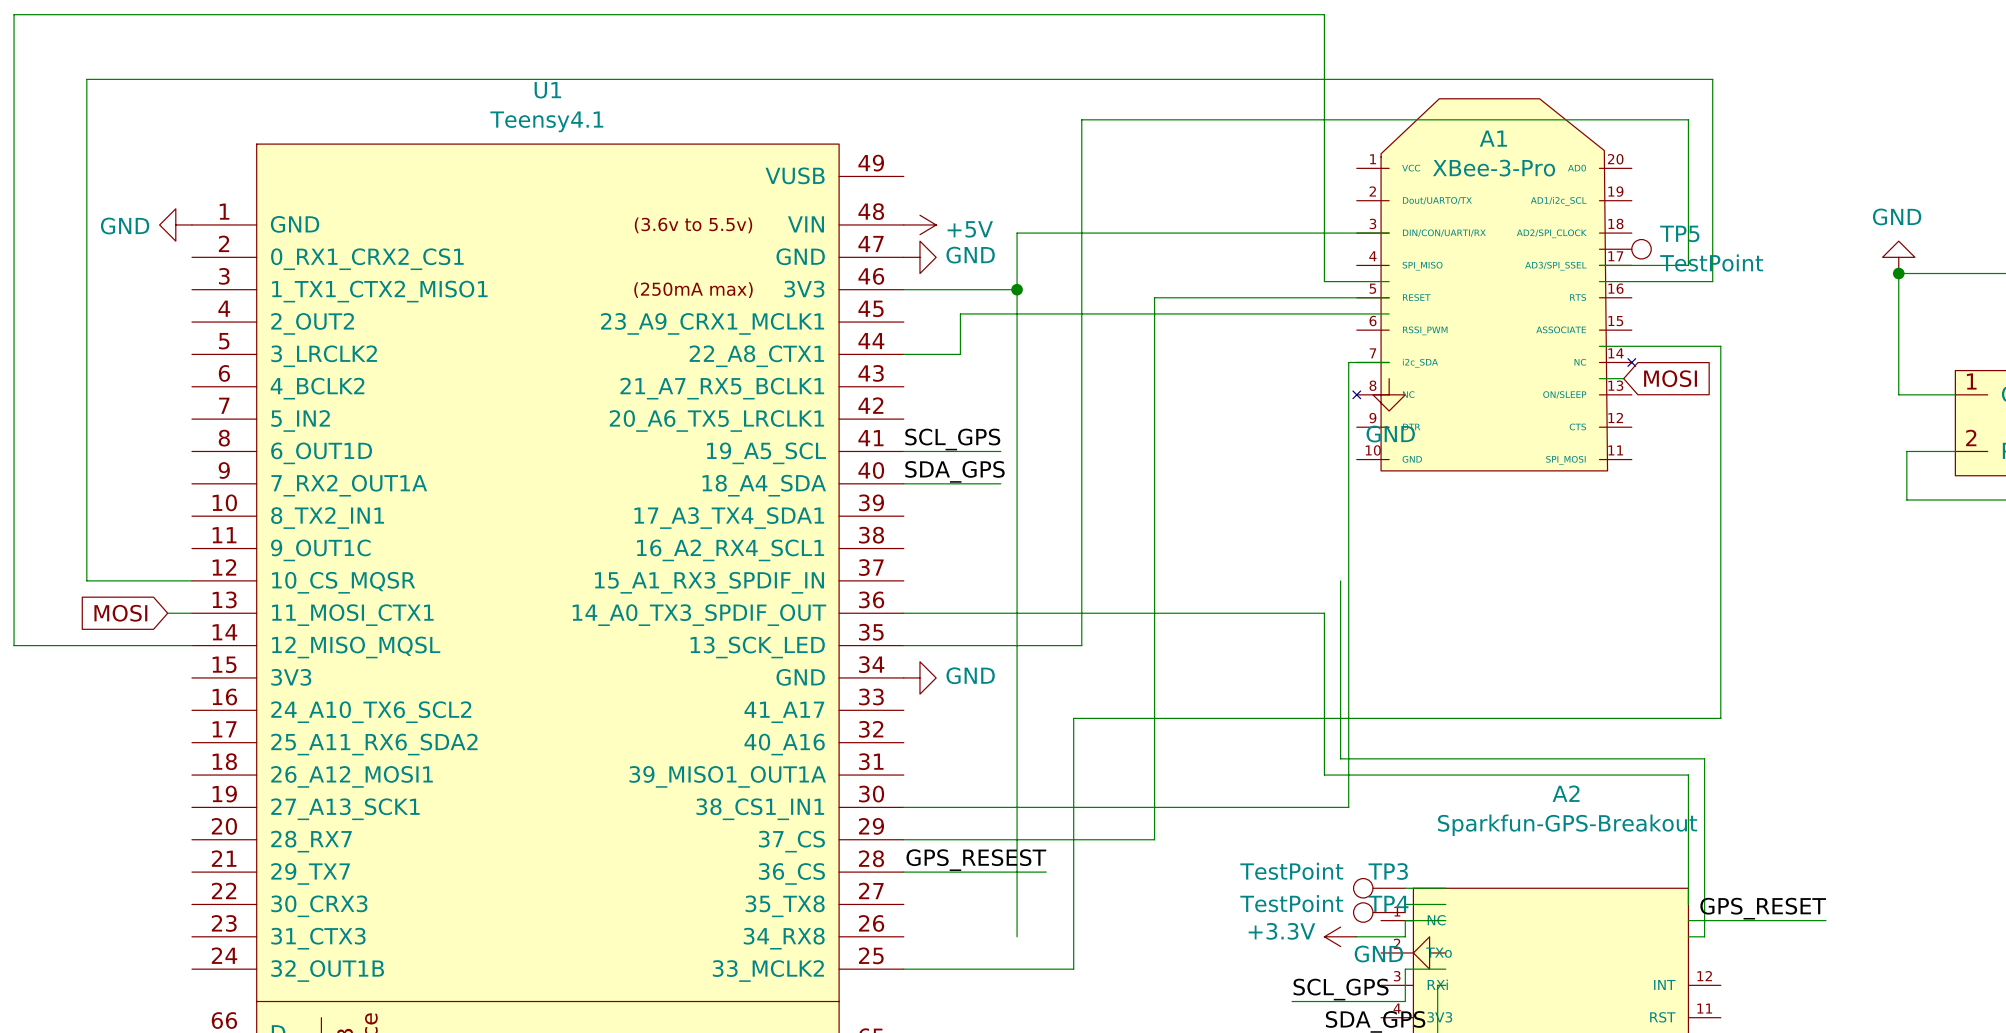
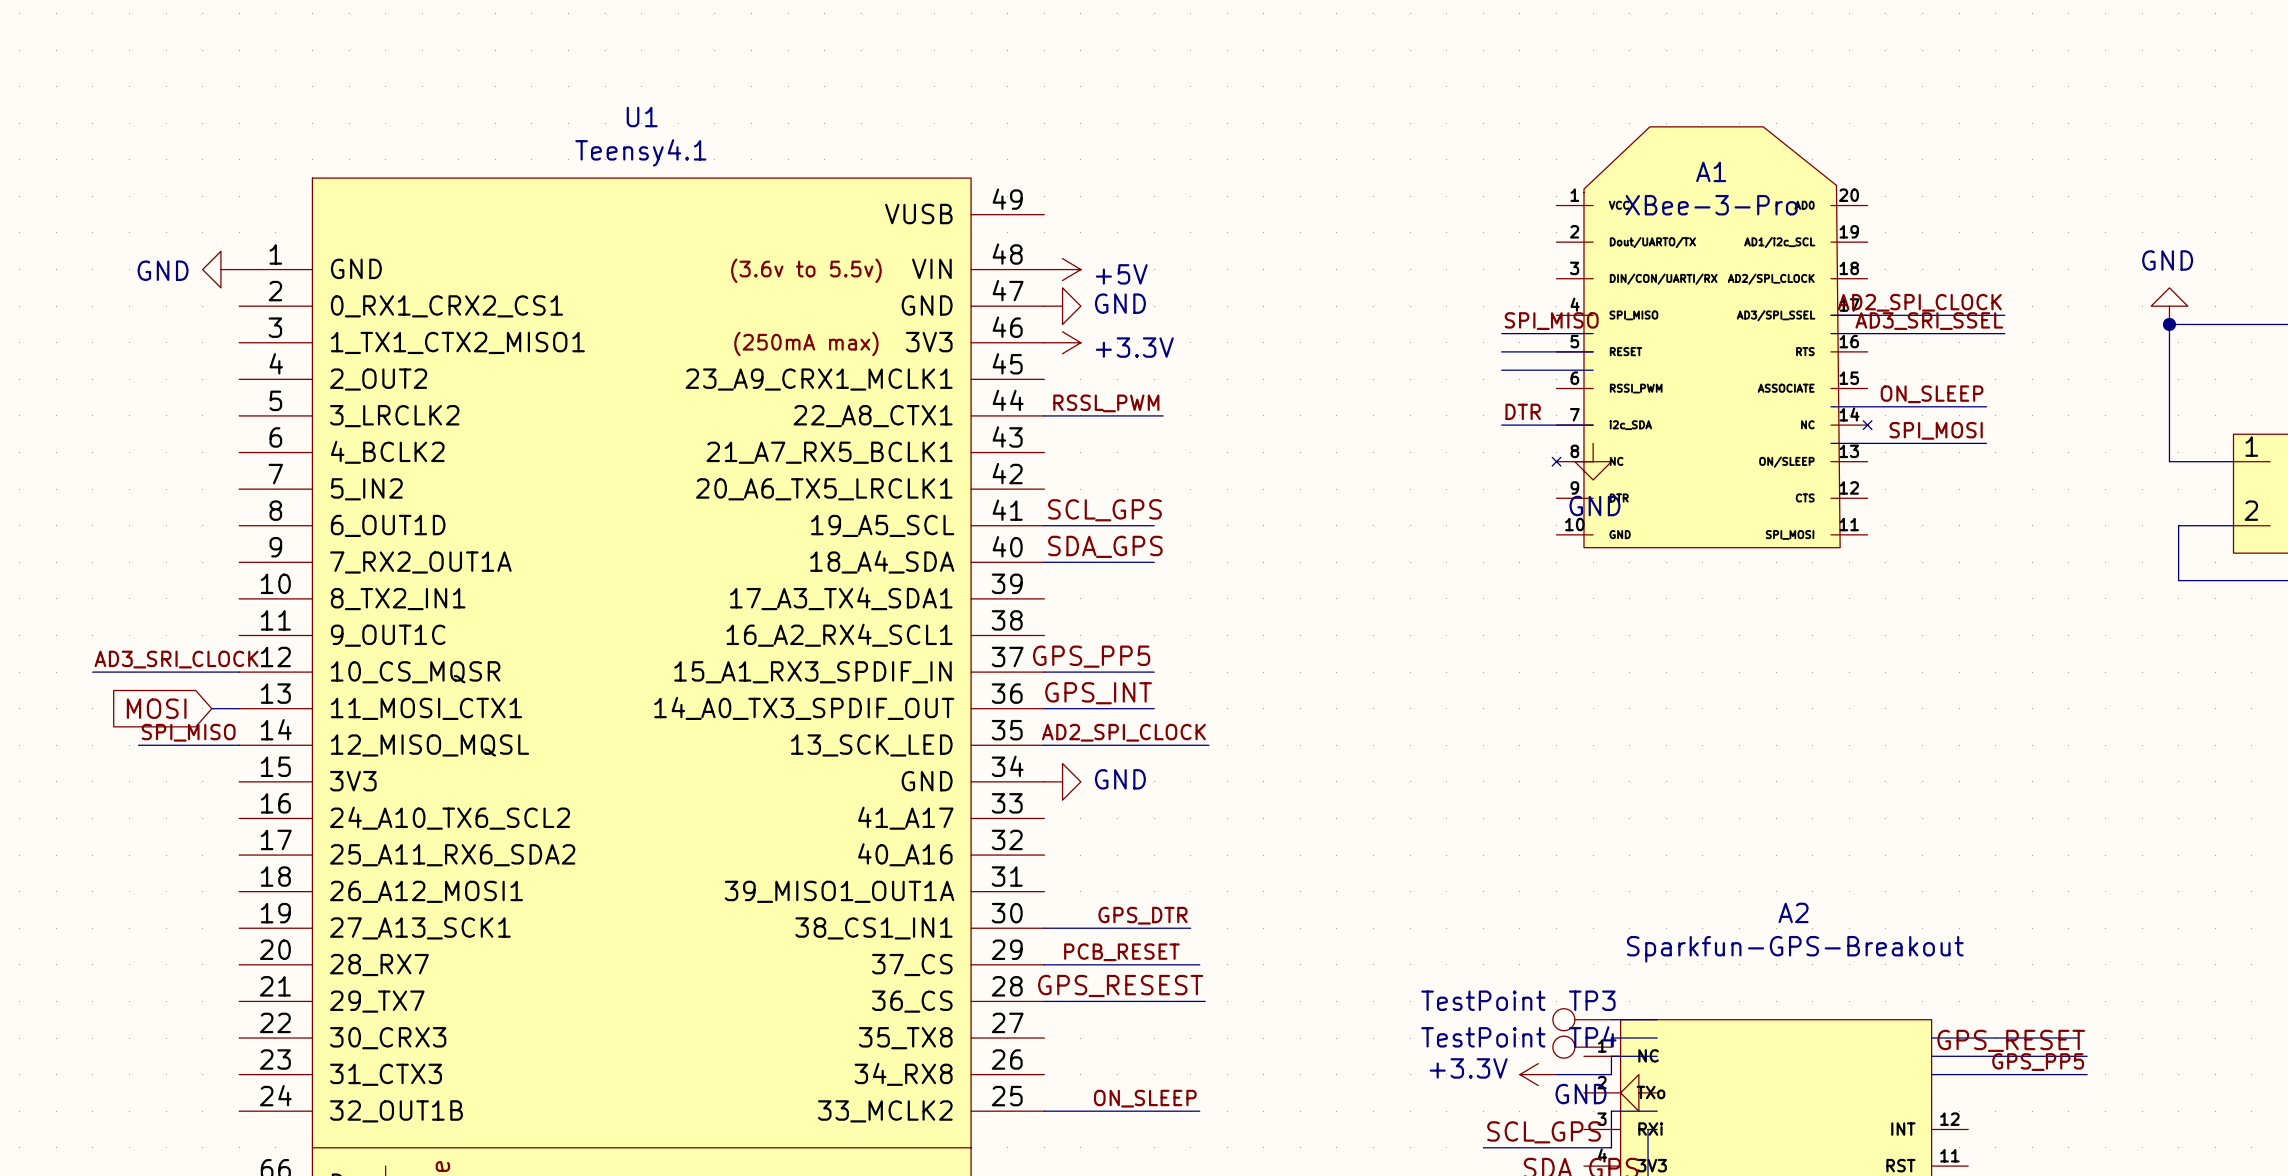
wire: (1389, 233) (1017, 233) (1017, 936) -> none
TP5: TestPoint (1625, 249) -> none
label: none -> AD2_SPI_CLOCK (1919, 302)
wire: (1688, 265) (1688, 119) (1081, 119) (1081, 645) (1049, 645) -> (1931, 315) (2004, 315)
label: none -> SPI_MISO (1551, 321)
label: none -> AD3_SRI_SSEL (1929, 321)
wire: (1324, 281) (1324, 14) (14, 14) (14, 645) (103, 645) -> (1519, 333) (1501, 333)
wire: (1712, 281) (1712, 79) (86, 79) (86, 580) -> (92, 672) (120, 672)
wire: none -> (1959, 333) (2004, 333)
wire: (903, 289) (1017, 289) -> none
power symbol: none -> +3.3V (1062, 342)
junction: (1017, 289) -> none
wire: (1308, 297) (1154, 297) (1154, 839) (1041, 839) -> none
wire: (1308, 313) (960, 313) (960, 354) -> (1163, 415) (1108, 415)
label: none -> ON_SLEEP (1932, 394)
label: none -> RSSL_PWM (1106, 403)
wire: (1720, 346) (1720, 718) (1073, 718) (1073, 969) (1041, 969) -> (1968, 406) (1986, 406)
label: none -> DTR (1523, 411)
wire: (1348, 362) (1348, 807) (1033, 807) -> (1547, 425) (1501, 425)
label: none -> SPI_MOSI (1936, 430)
wire: none -> (1858, 443) (1986, 443)
global label: MOSI (1670, 378) -> none
label: none -> GPS_PP5 (1091, 656)
label: none -> AD3_SRI_CLOCK (176, 659)
wire: none -> (1044, 672) (1154, 672)
wire: (1340, 580) (1340, 758) (1704, 758) (1704, 936) -> (2087, 1074) (1949, 1074)
label: none -> GPS_INT (1098, 693)
wire: (1000, 613) (1324, 613) (1324, 775) (1688, 775) (1688, 904) -> (2077, 1038) (1931, 1038)
label: none -> SPI_MISO (188, 732)
label: none -> AD2_SPI_CLOCK (1123, 732)
label: none -> GPS_DTR (1142, 915)
label: none -> PCB_RESET (1121, 952)
label: none -> GPS_PP5 (2038, 1062)
label: none -> ON_SLEEP (1145, 1098)

